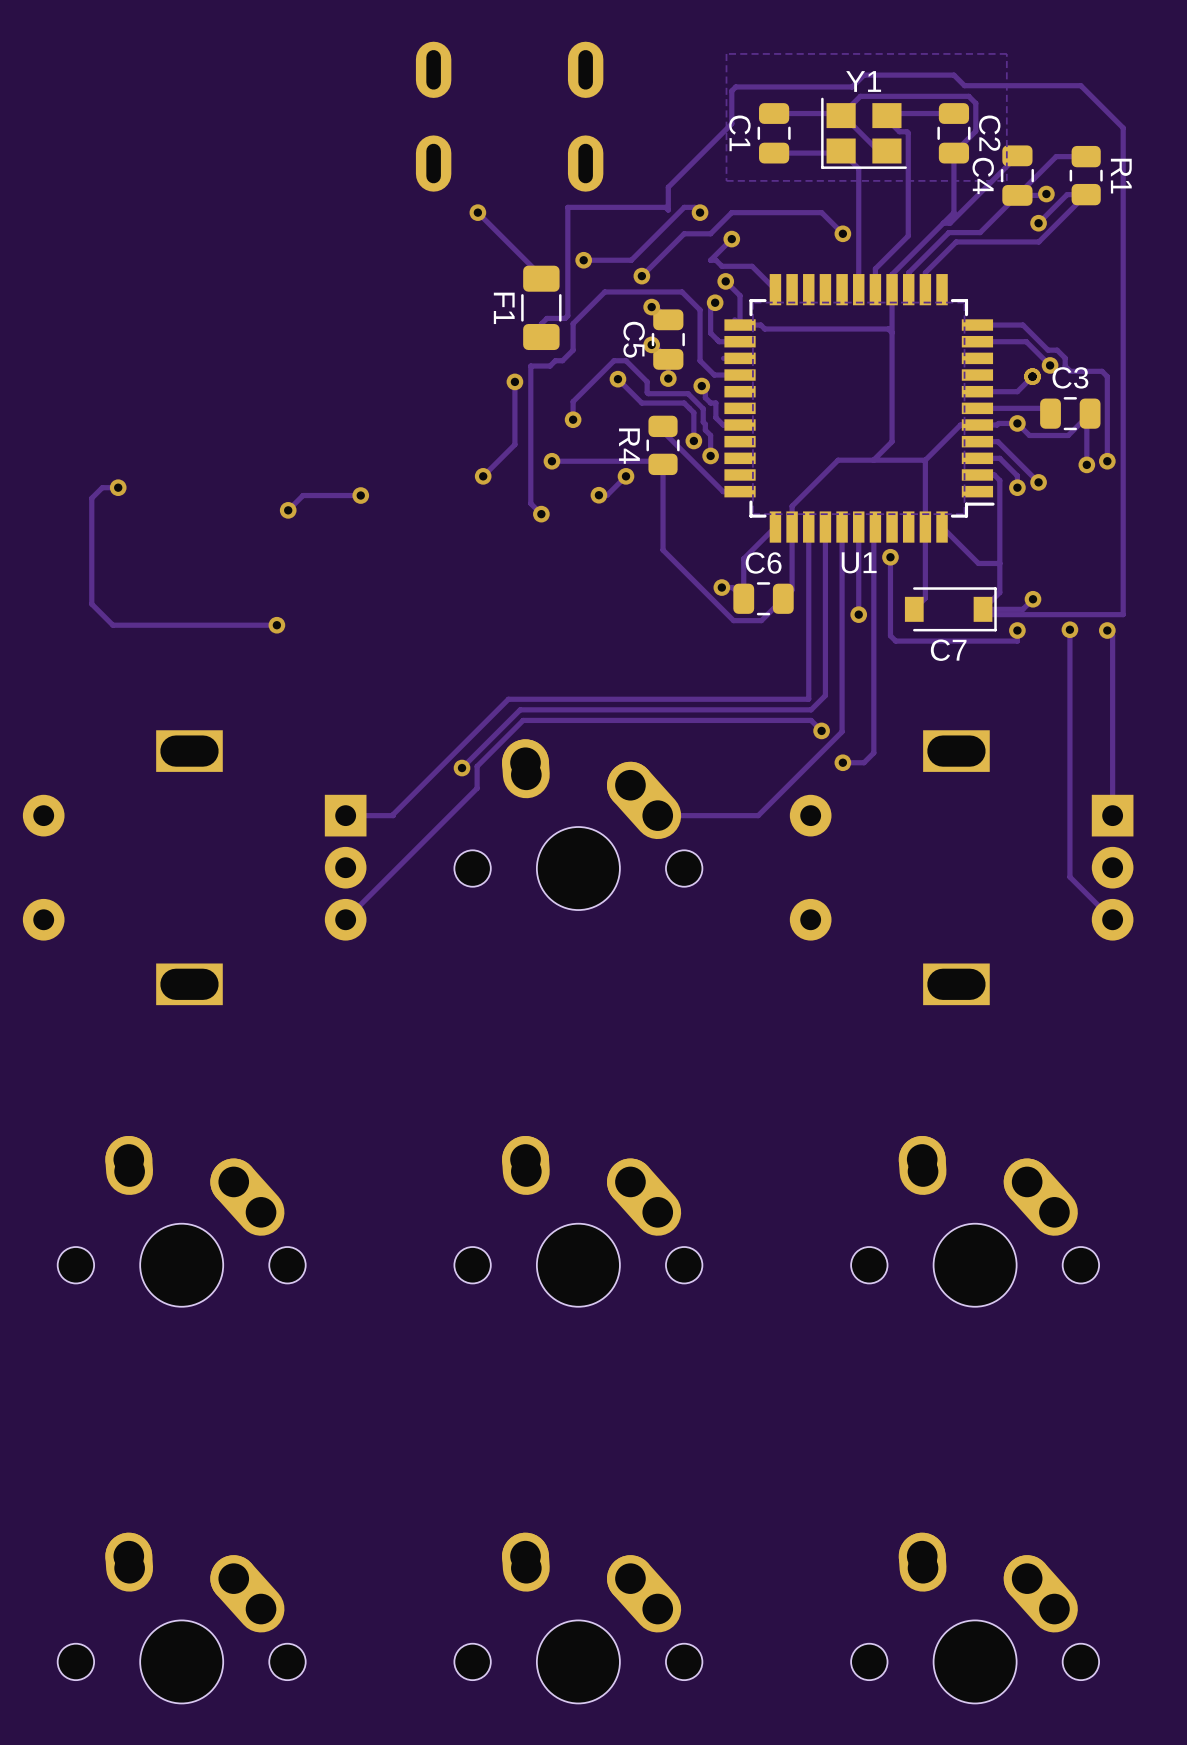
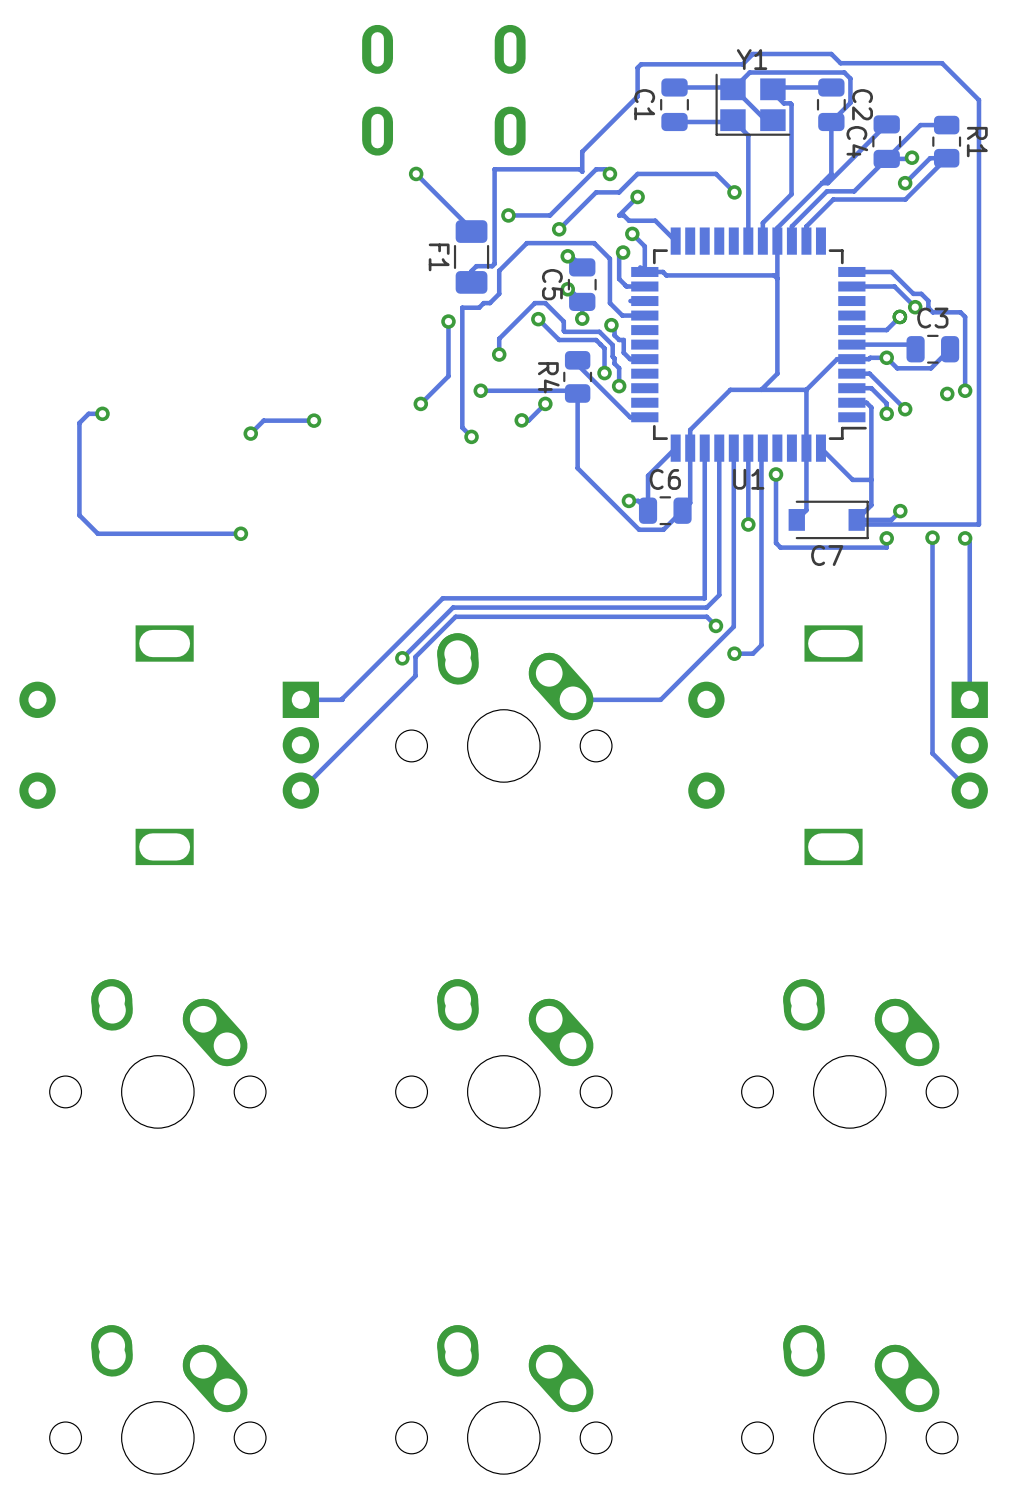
zone outline: (1006, 53) (1006, 180) (726, 180) (726, 53) (1006, 53) -> none
zone outline: (964, 302) (964, 514) (752, 514) (752, 302) (964, 302) -> none
track: (1086, 416) (1086, 464) -> none

